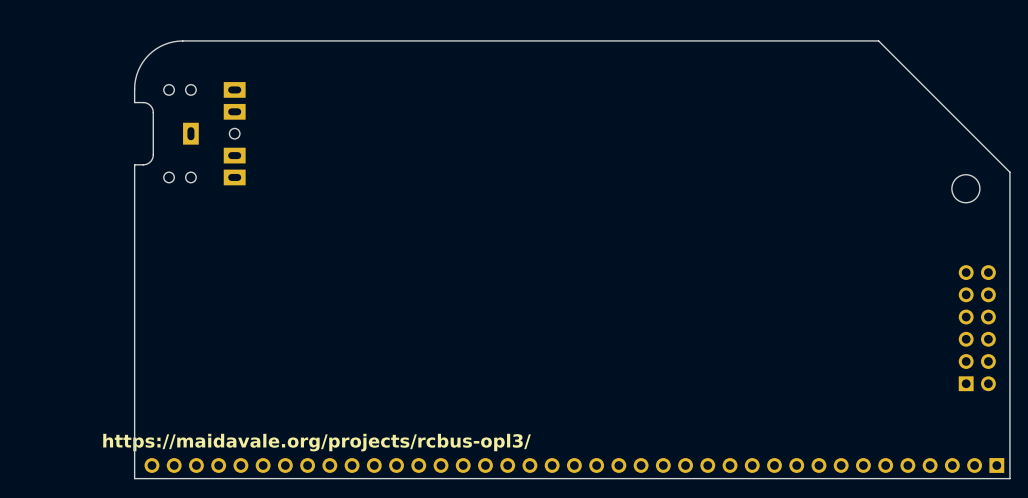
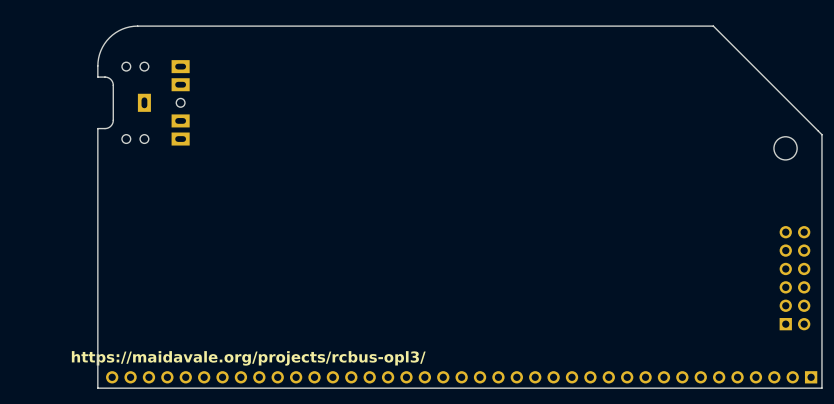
part position: (977, 328) -> (794, 278)

